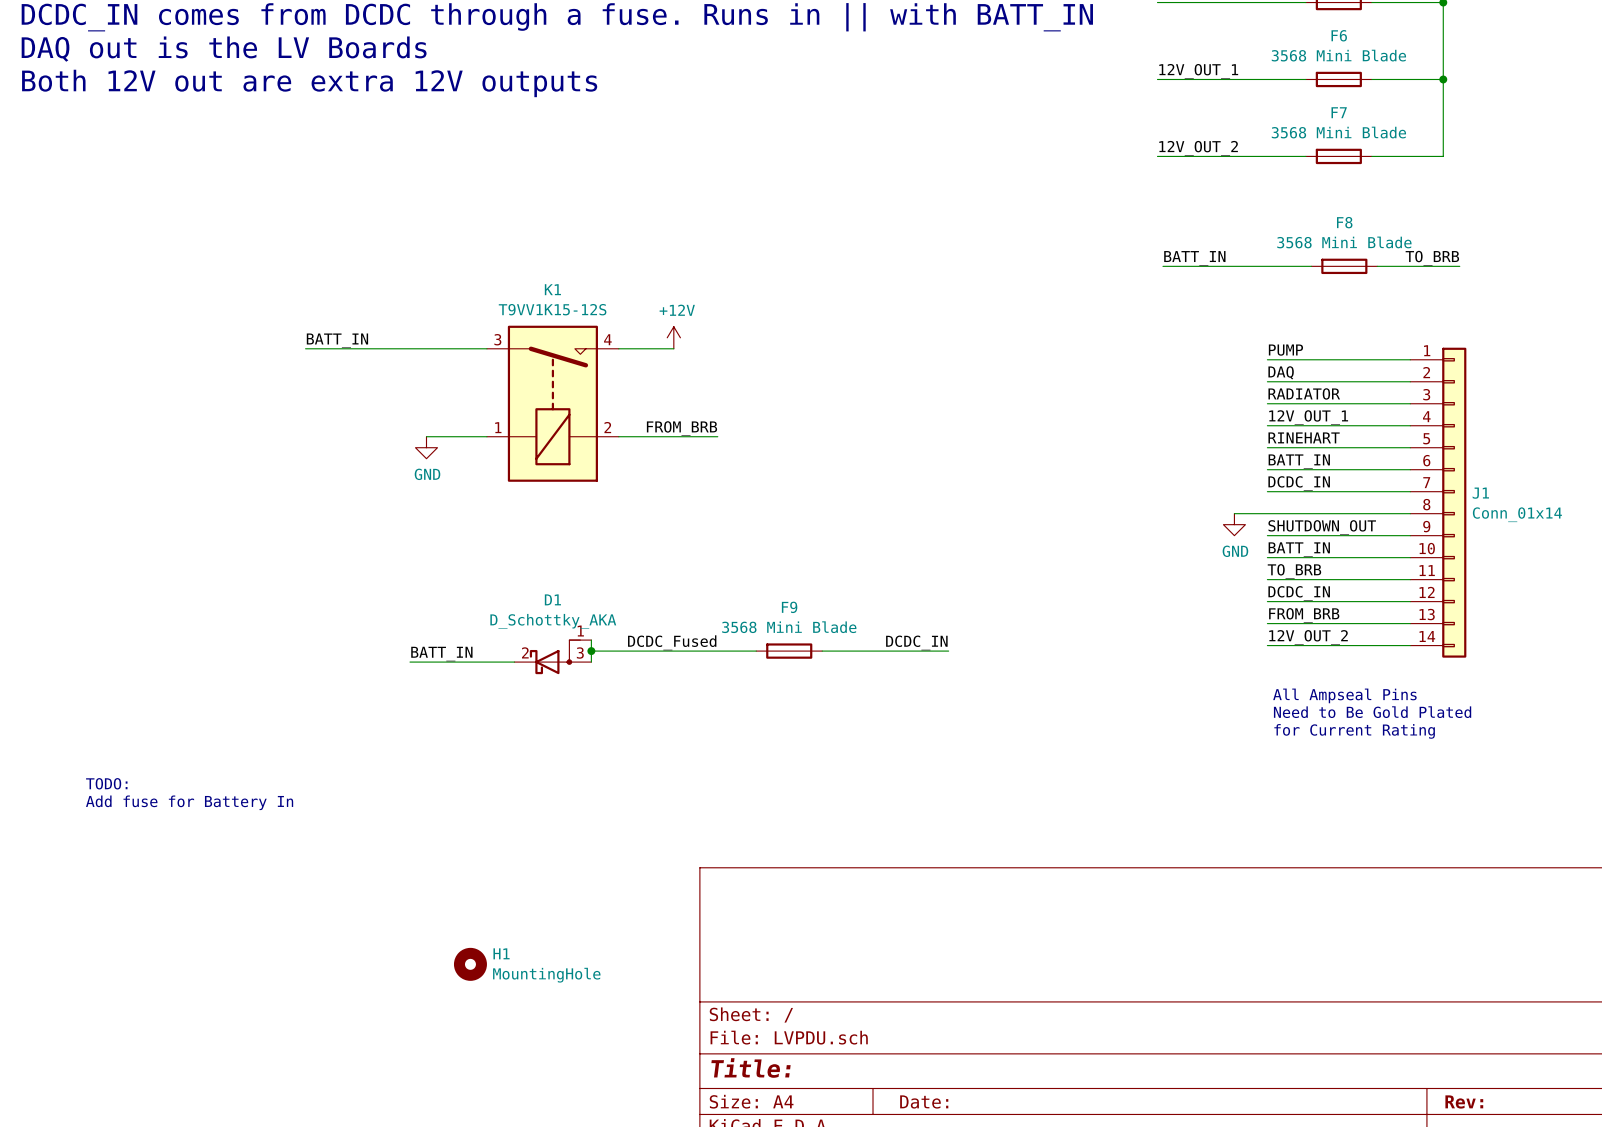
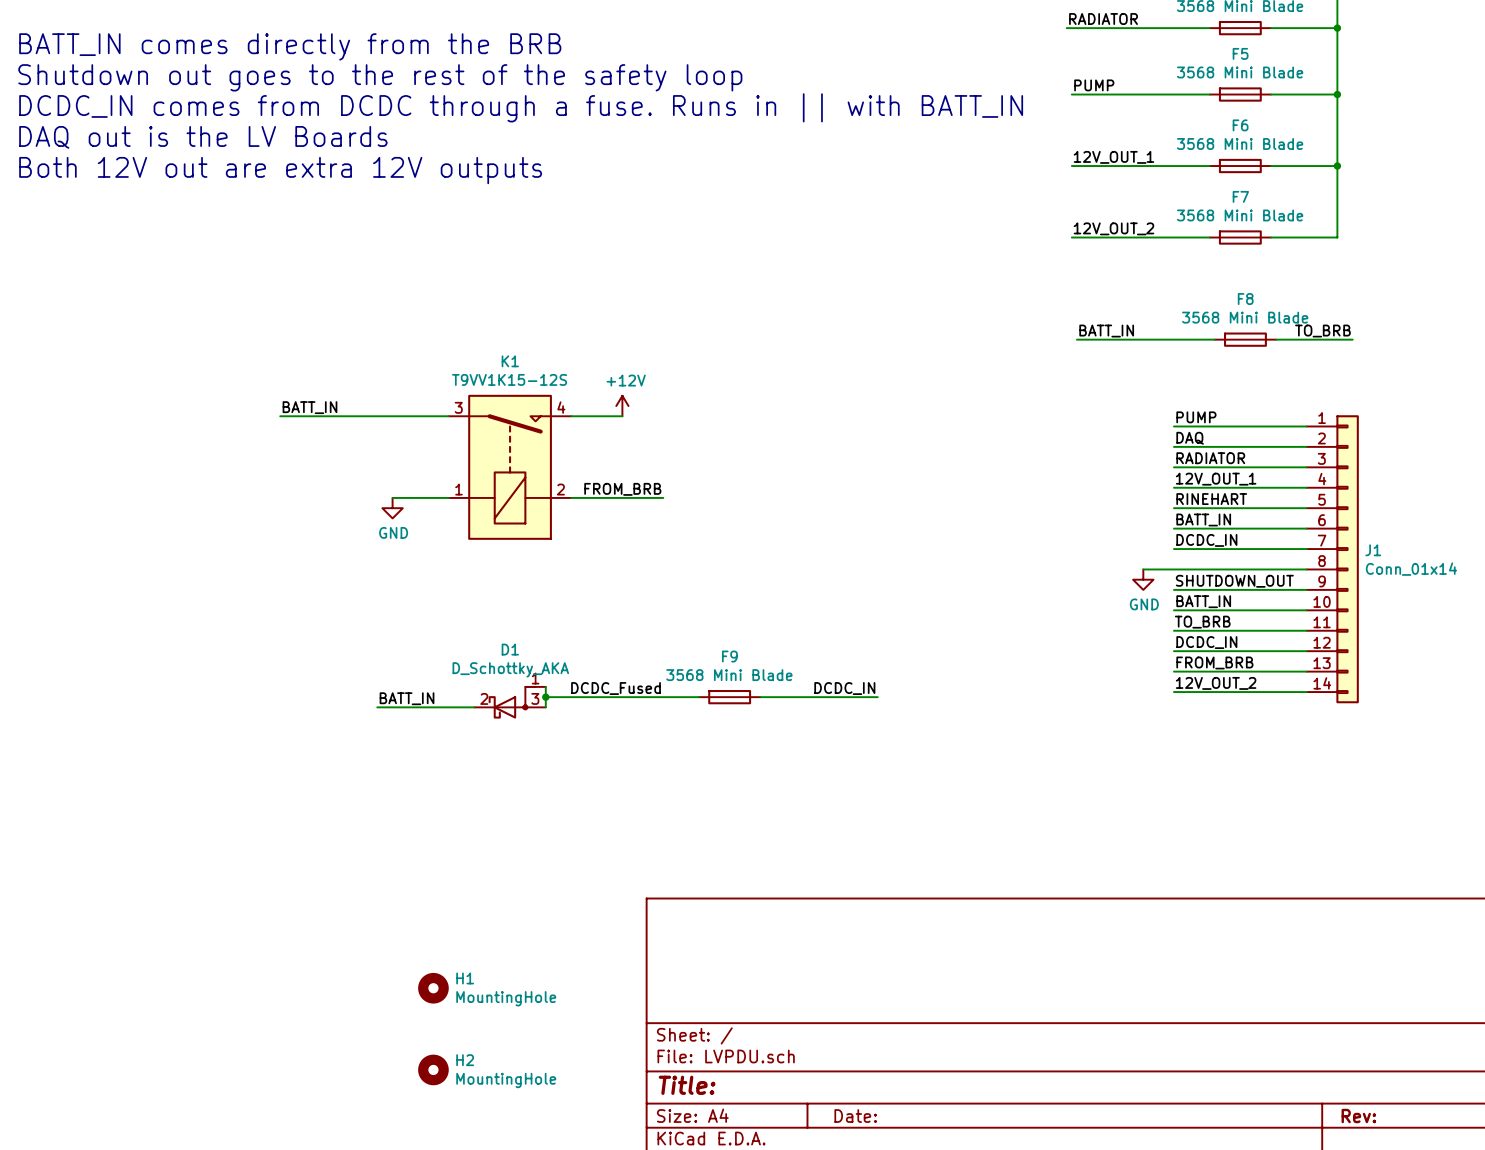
text: All Ampseal Pins (1344, 695) -> none
text: Need to Be Gold Plated (1372, 712) -> none
text: for Current Rating (1354, 731) -> none
text: TODO: (106, 783) -> none
text: Add fuse for Battery In (189, 802) -> none
H2: none -> MountingHole (433, 1069)

